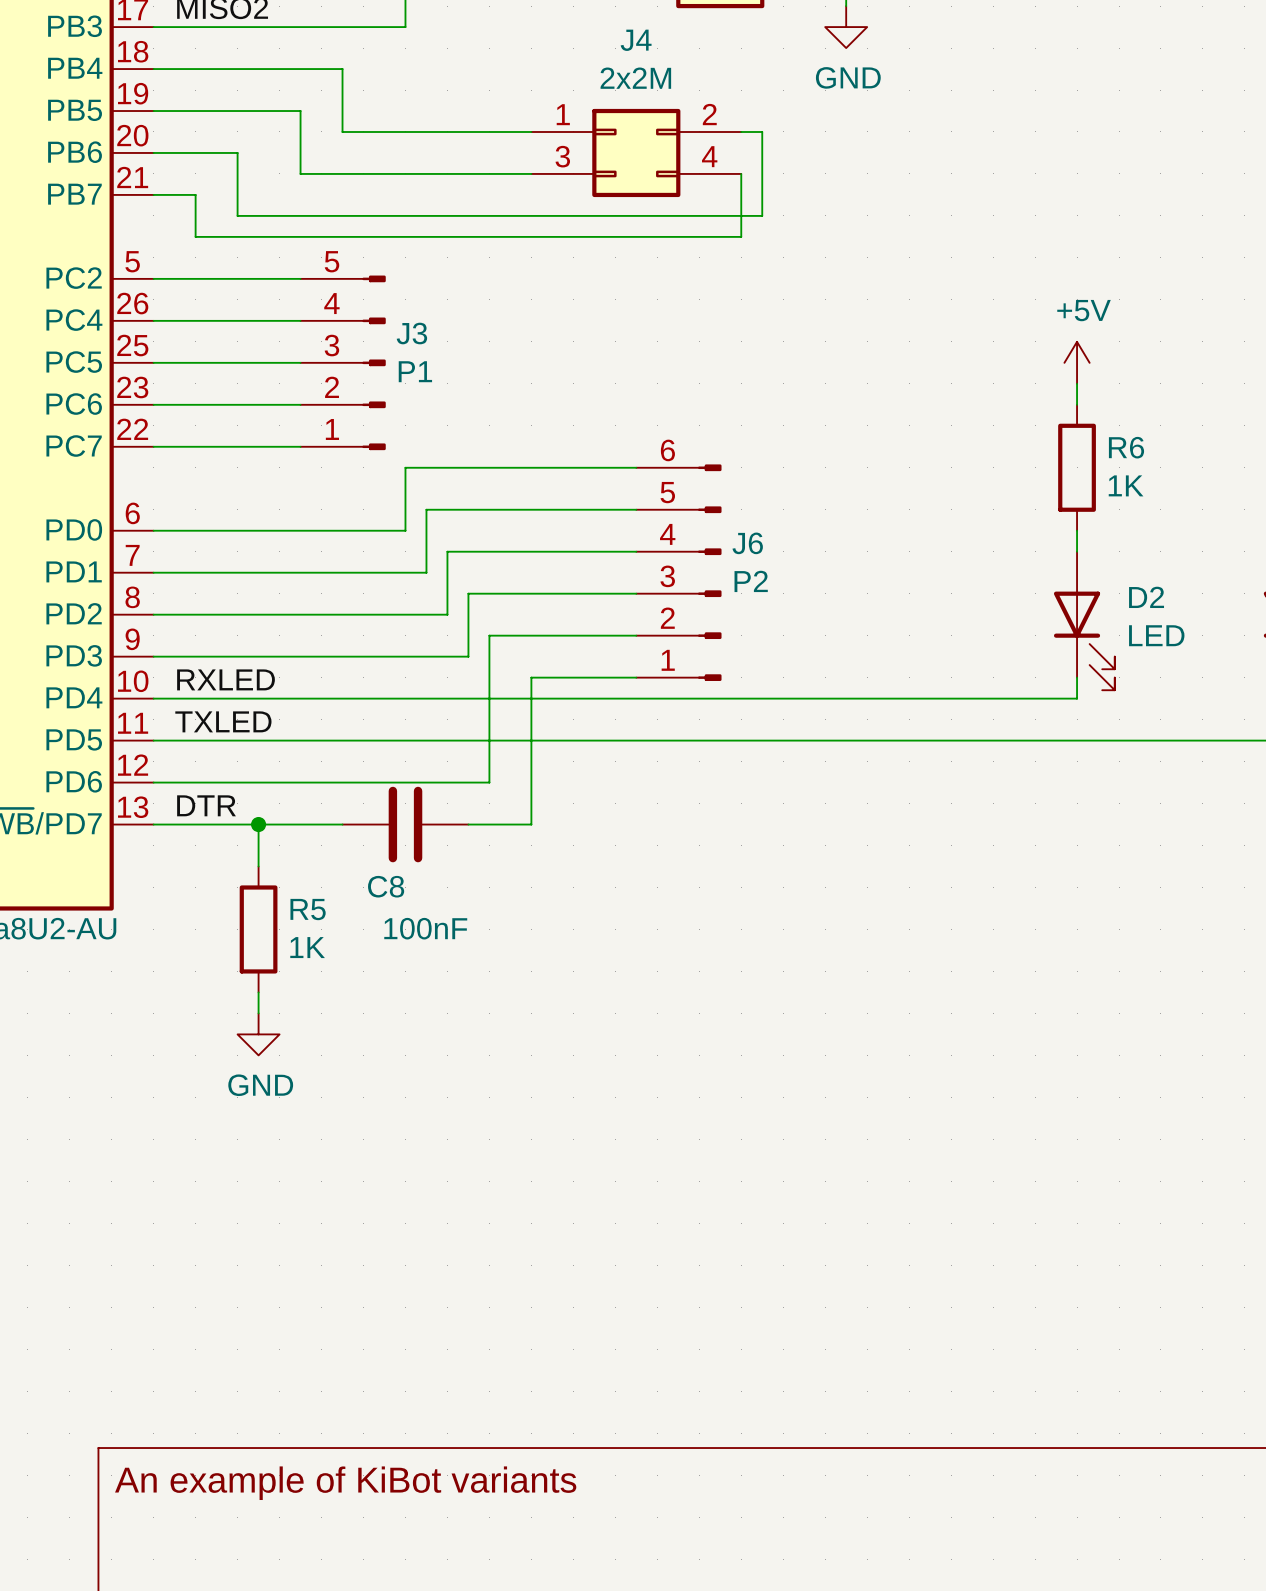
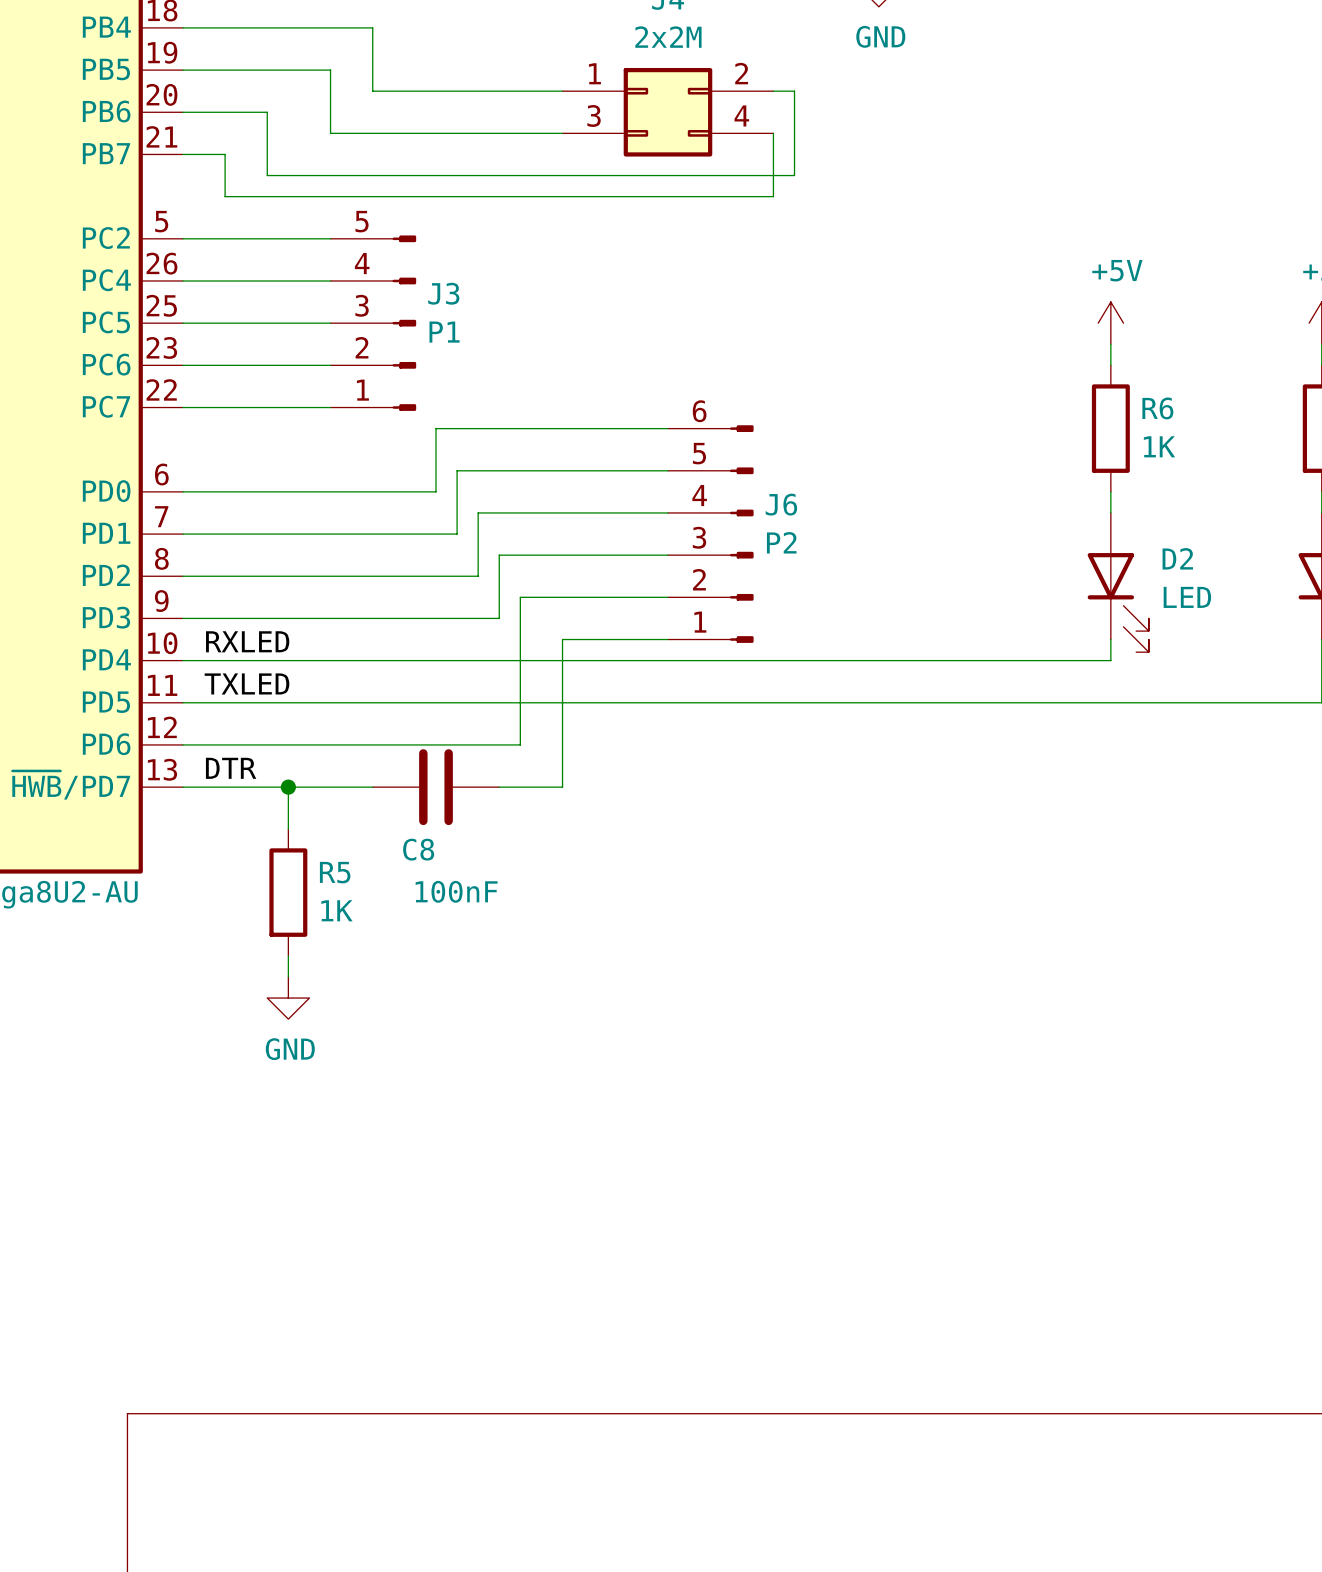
title block: An example of KiBot variants (345, 1483) -> none

